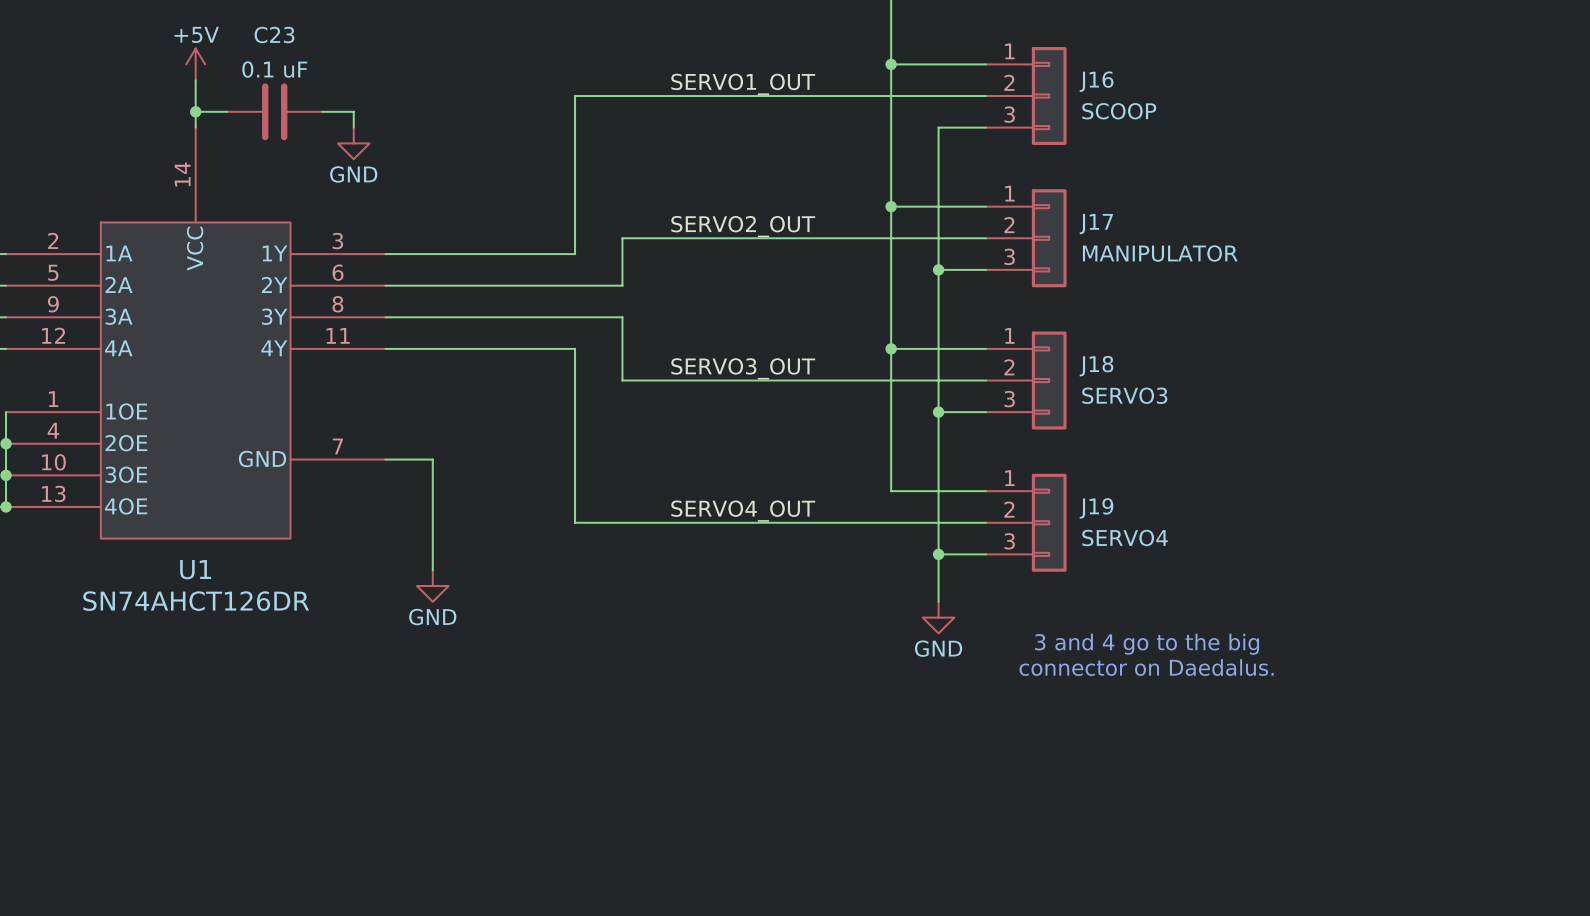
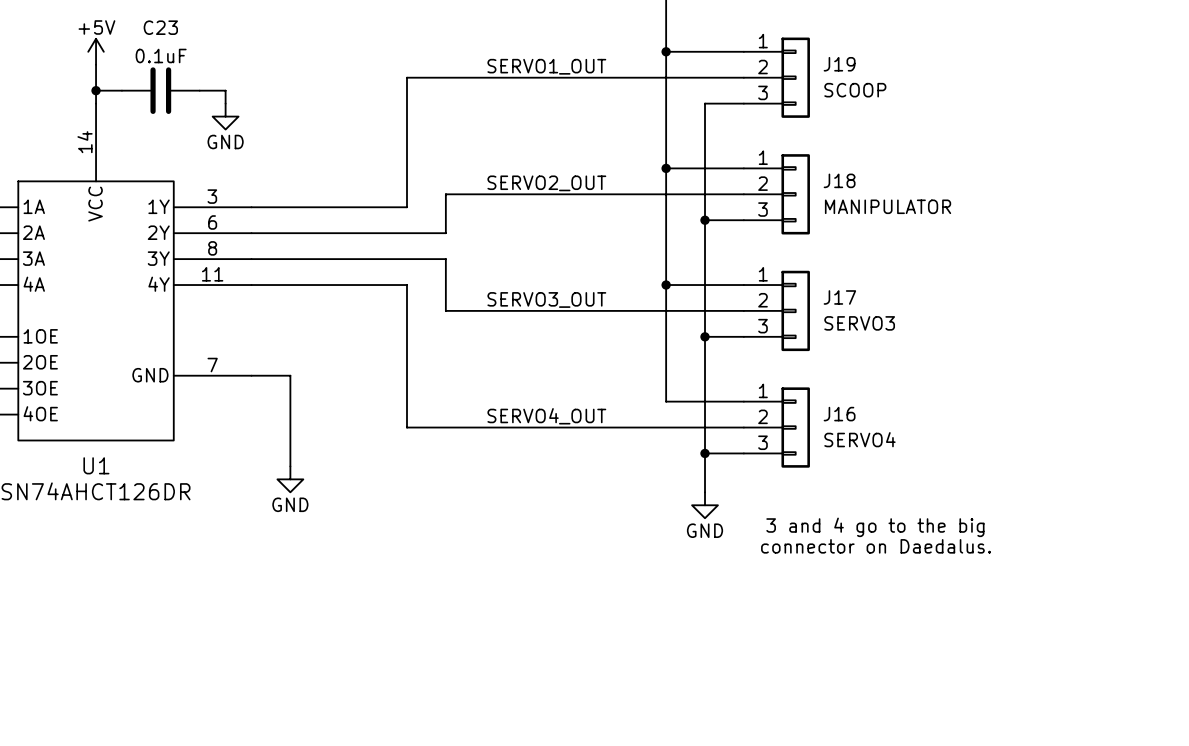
C23 value: 0.1 uF (274, 69) -> 0.1uF (161, 55)
J16 name: J16 (1096, 81) -> J19 (839, 64)
J17 name: J17 (1096, 224) -> J18 (839, 180)
J18 name: J18 (1096, 366) -> J17 (839, 297)
J19 name: J19 (1096, 508) -> J16 (839, 414)

